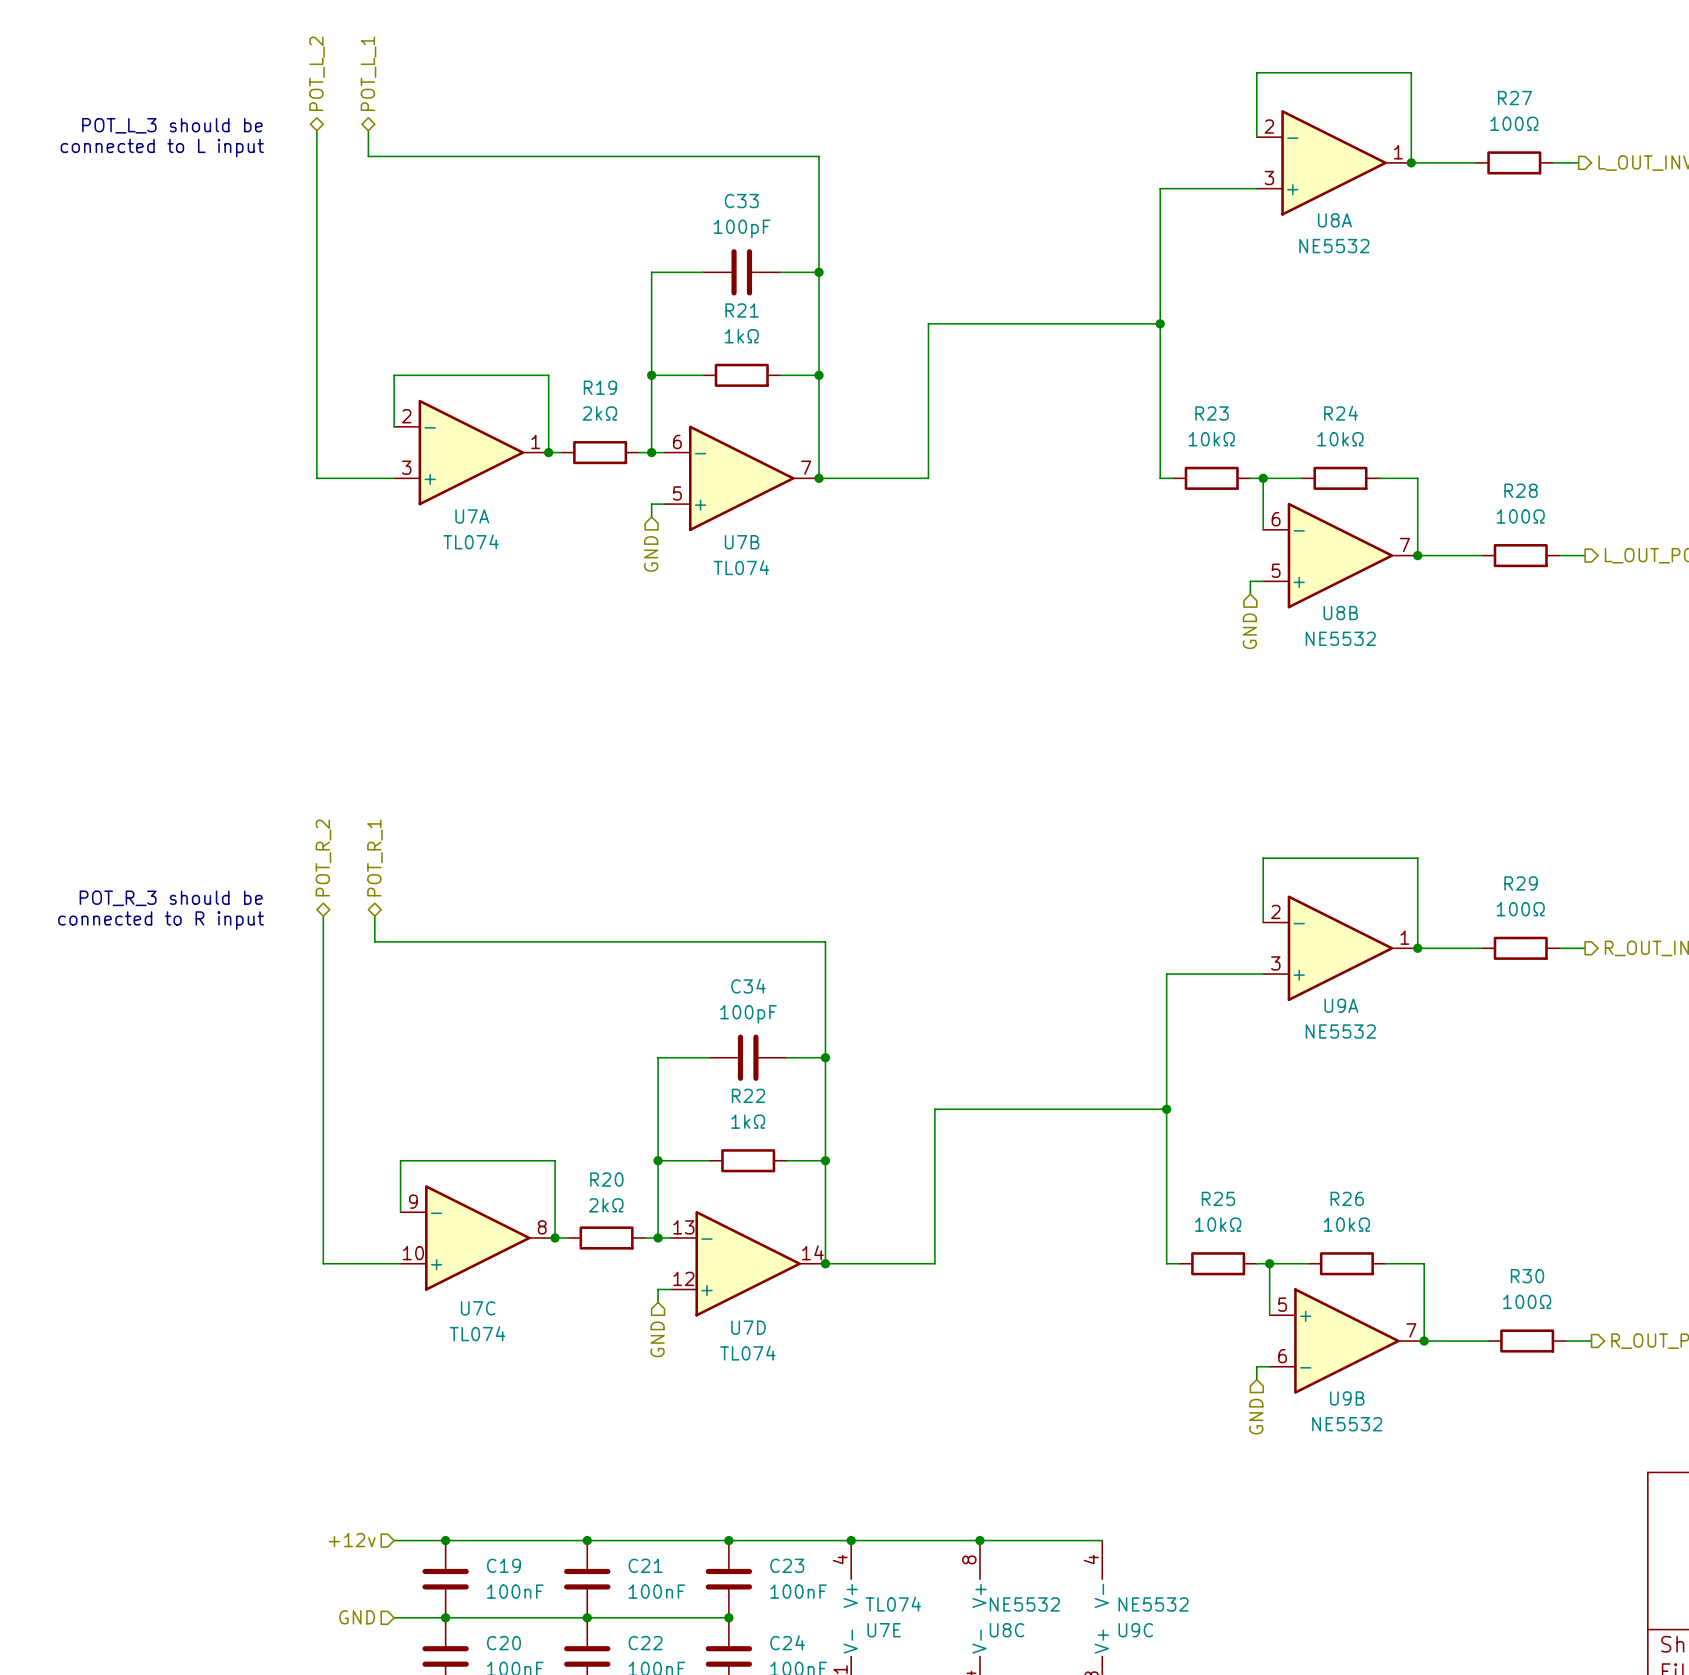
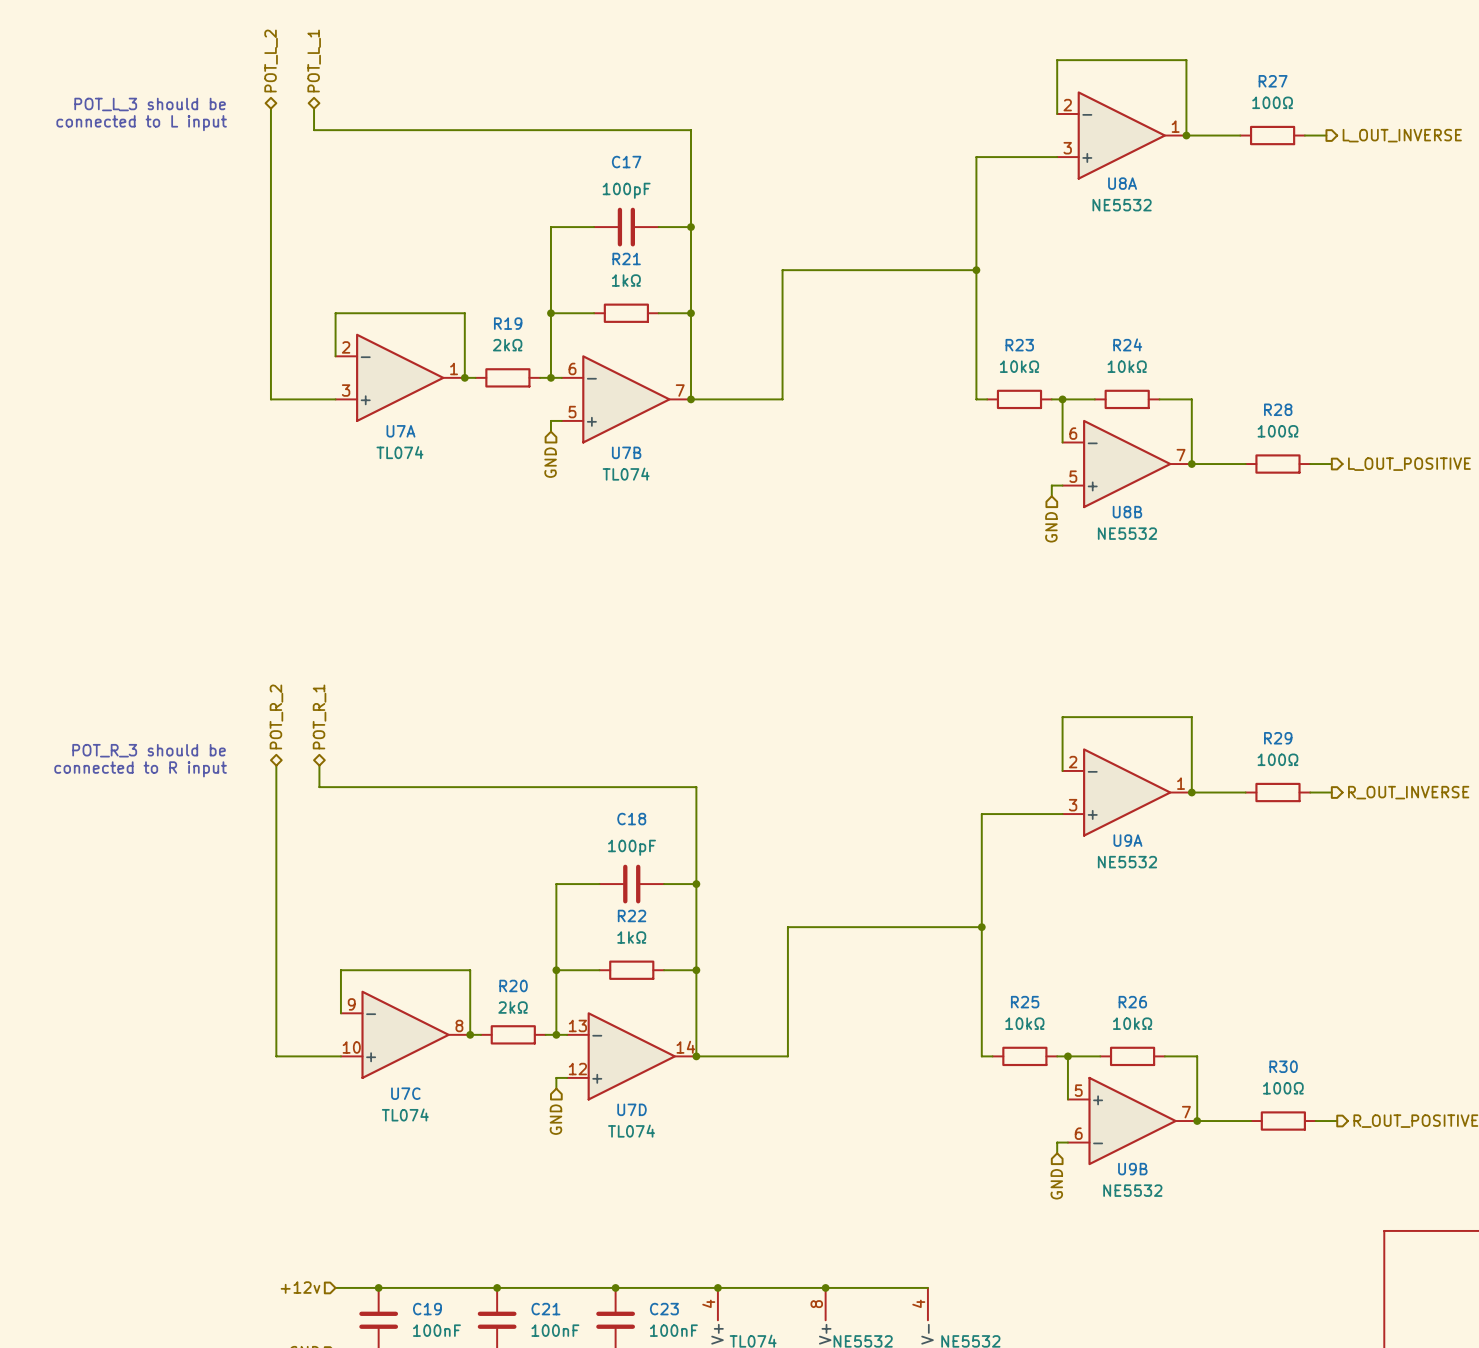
C33 name: C33 (741, 201) -> C17 (626, 162)
C34 name: C34 (748, 986) -> C18 (631, 819)

